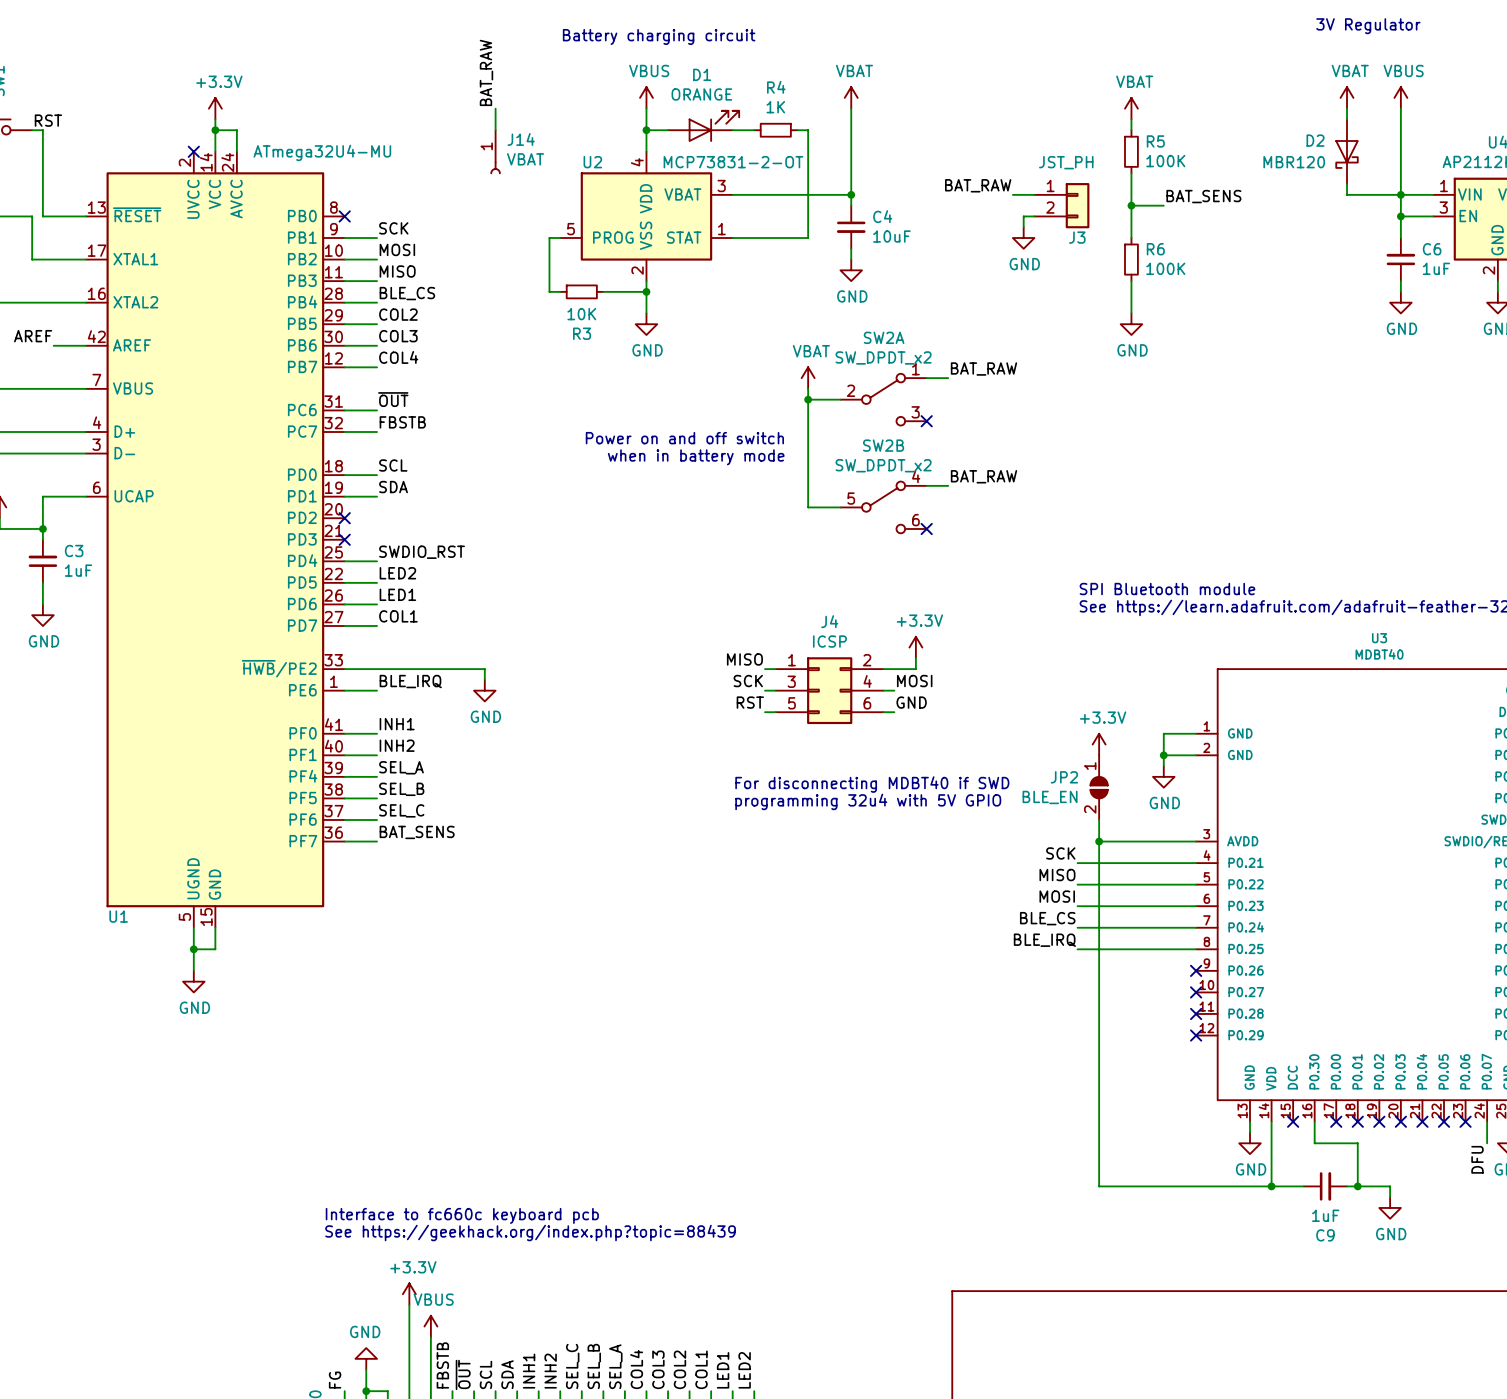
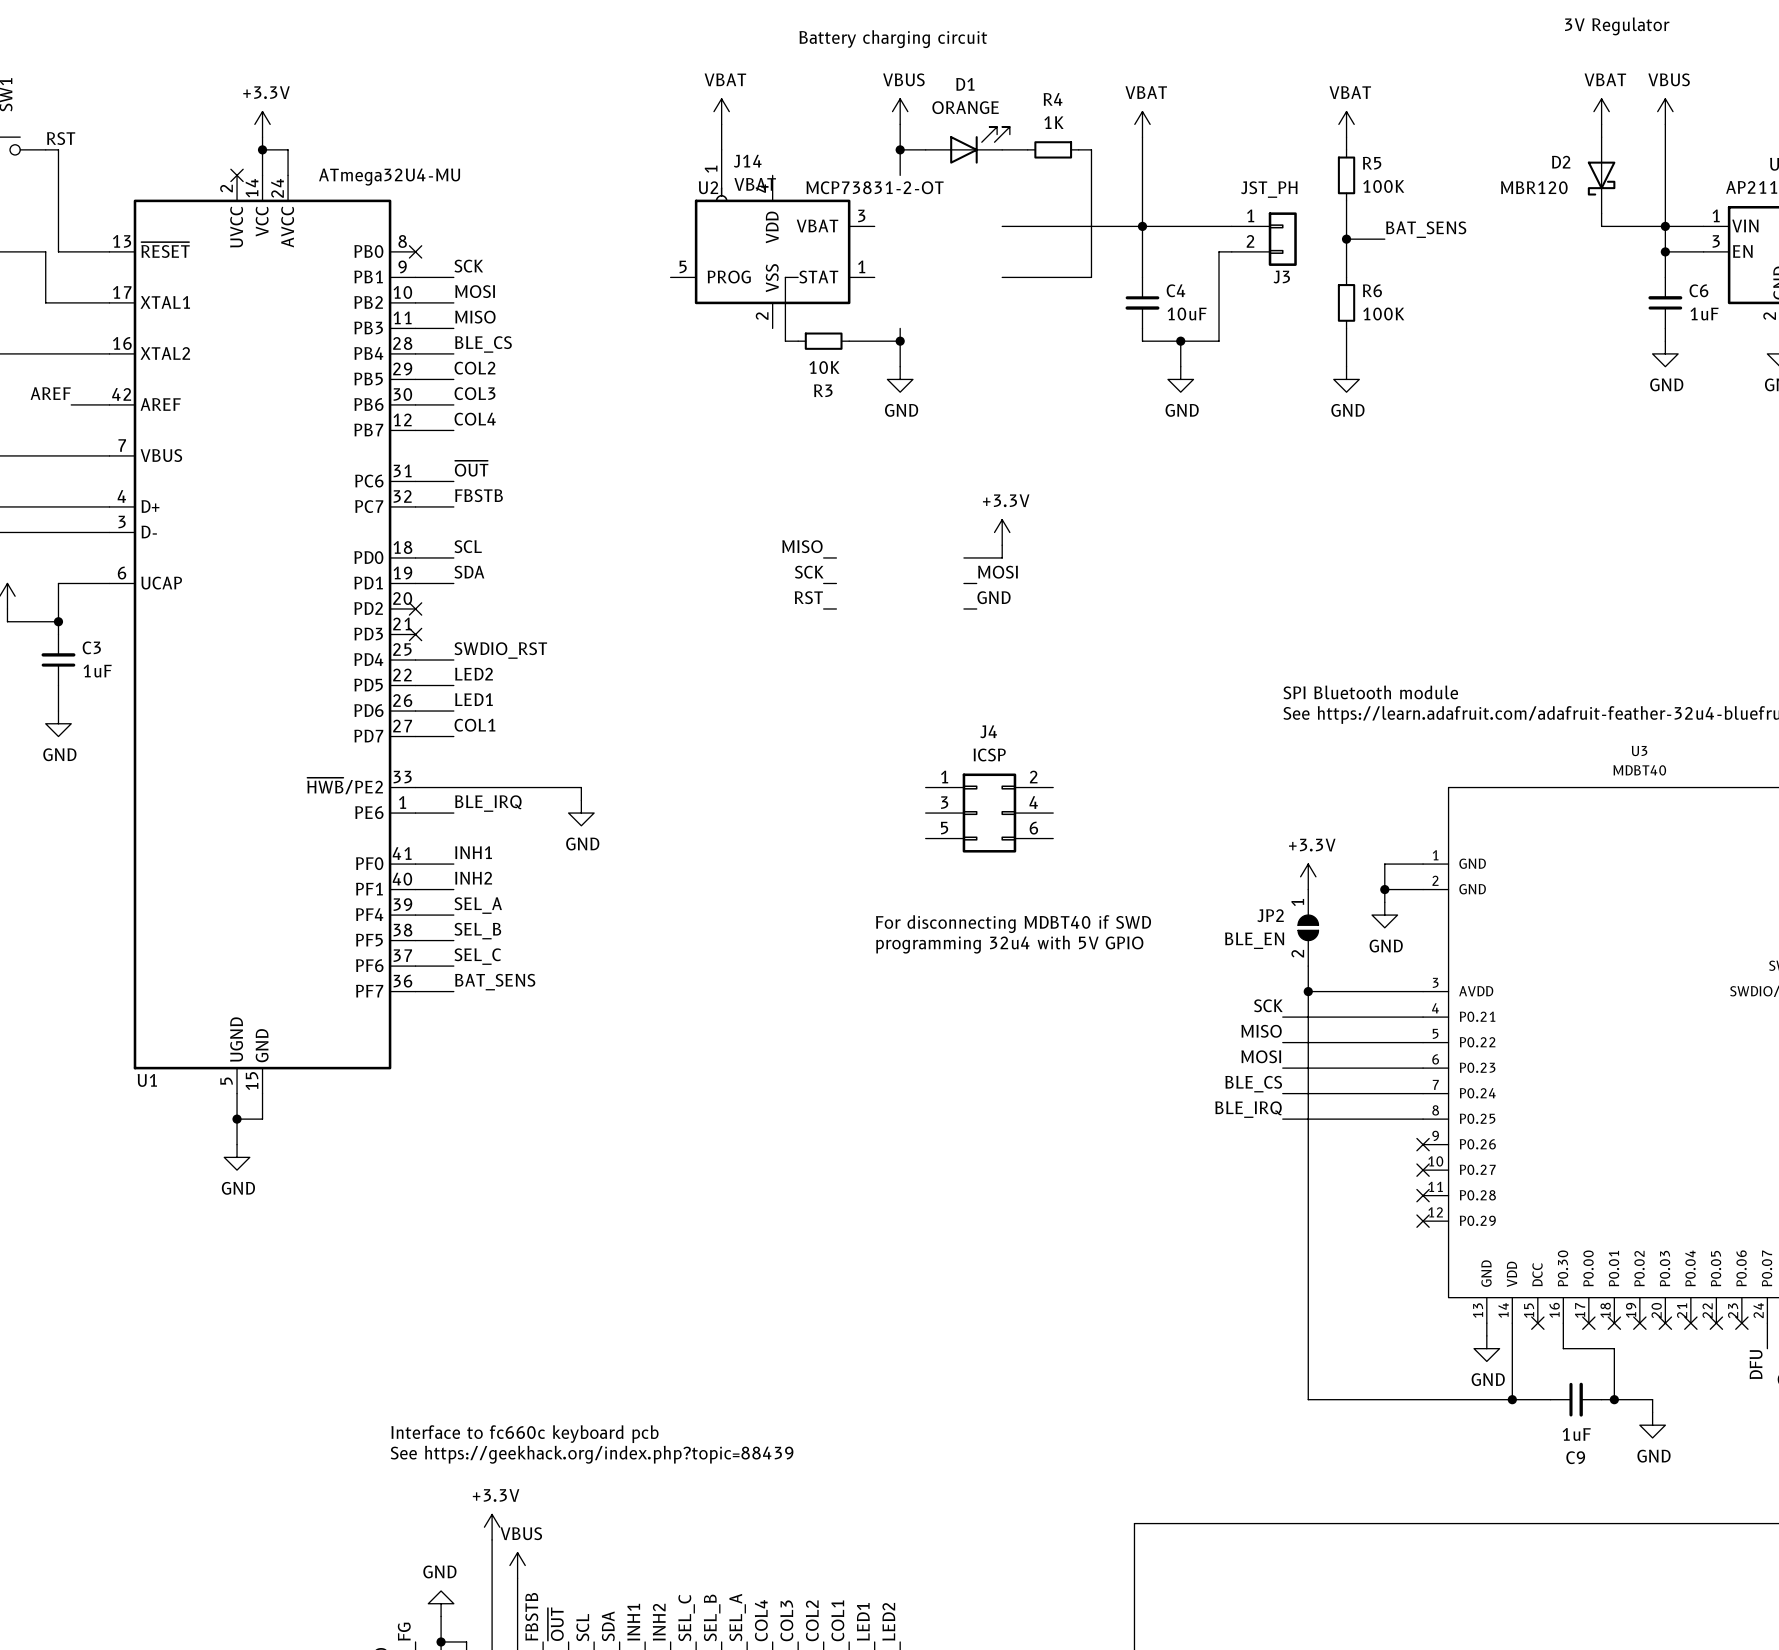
text position: Battery charging circuit (659, 36) -> Battery charging circuit (893, 39)
label: BAT_RAW (486, 72) -> none
power symbol: none -> VBAT (721, 111)
power symbol position: VBUS (646, 97) -> VBUS (900, 111)
power symbol position: VBAT (851, 97) -> VBAT (1142, 124)
wire: (495, 108) (495, 130) -> (721, 124) (721, 149)
wire: (646, 108) (646, 151) -> (900, 124) (900, 175)
wire: (851, 108) (851, 205) -> none
wire: none -> (1142, 137) (1142, 277)
D1 position: (703, 126) -> (967, 145)
wire: (646, 130) (668, 130) -> (1002, 149) (1027, 149)
junction: (646, 130) -> none
wire: (732, 130) (754, 130) -> (925, 149) (900, 149)
junction: none -> (900, 149)
R4 position: (775, 130) -> (1053, 149)
wire: (797, 130) (808, 130) (808, 238) (732, 238) -> (1078, 149) (1091, 149) (1091, 277) (1002, 277)
J14 position: (495, 152) -> (721, 175)
label: BAT_RAW (978, 185) -> none
wire: (732, 194) (840, 194) -> none
wire: none -> (1014, 226) (1206, 226)
junction: (851, 194) -> none
junction: none -> (1142, 226)
C4 position: (851, 227) -> (1142, 302)
wire: none -> (1219, 264) (1219, 341) (1142, 341) (1142, 328)
wire: (560, 238) (549, 238) (549, 291) (560, 291) -> (798, 277) (785, 277) (785, 341) (798, 341)
power symbol: GND (1023, 238) -> none
wire: (851, 248) (851, 259) -> none
power symbol: GND (851, 270) -> none
wire: (646, 281) (646, 313) -> (900, 328) (900, 366)
R3 position: (581, 291) -> (823, 341)
wire: (603, 291) (646, 291) -> (849, 341) (900, 341)
junction: (646, 291) -> none
junction: none -> (900, 341)
wire: none -> (1180, 341) (1180, 366)
junction: none -> (1180, 341)
power symbol: GND (646, 324) -> none
power symbol: none -> GND (900, 379)
power symbol: none -> GND (1180, 379)
label: BAT_RAW (983, 369) -> none
power symbol: VBAT (808, 378) -> none
wire: (926, 378) (948, 378) -> none
wire: (808, 388) (808, 507) (840, 507) -> none
wire: (808, 399) (840, 399) -> none
junction: (808, 399) -> none
SW2A: SW_DPDT_x2 (883, 399) -> none
no-connect mark: (926, 421) -> none
text: Power on and off switch (684, 438) -> none
text: when in battery mode (696, 457) -> none
label: BAT_RAW (983, 476) -> none
wire: (926, 485) (948, 485) -> none
SW2B: SW_DPDT_x2 (883, 507) -> none
no-connect mark: (926, 528) -> none
power symbol position: +3.3V (915, 647) -> +3.3V (1002, 532)
wire: (915, 658) (915, 669) (883, 669) -> (1002, 545) (1002, 557) (963, 557)
label position: MISO (744, 659) -> MISO (802, 546)
wire: (765, 669) (775, 669) -> (823, 557) (836, 557)
label position: SCK (748, 681) -> SCK (809, 572)
label position: MOSI (914, 681) -> MOSI (997, 572)
wire: (765, 690) (775, 690) -> (823, 583) (836, 583)
wire: (883, 690) (894, 690) -> (963, 583) (976, 583)
label position: RST (750, 702) -> RST (808, 597)
label position: GND (911, 702) -> GND (994, 597)
wire: (765, 712) (775, 712) -> (823, 608) (836, 608)
wire: (883, 712) (894, 712) -> (963, 608) (976, 608)

